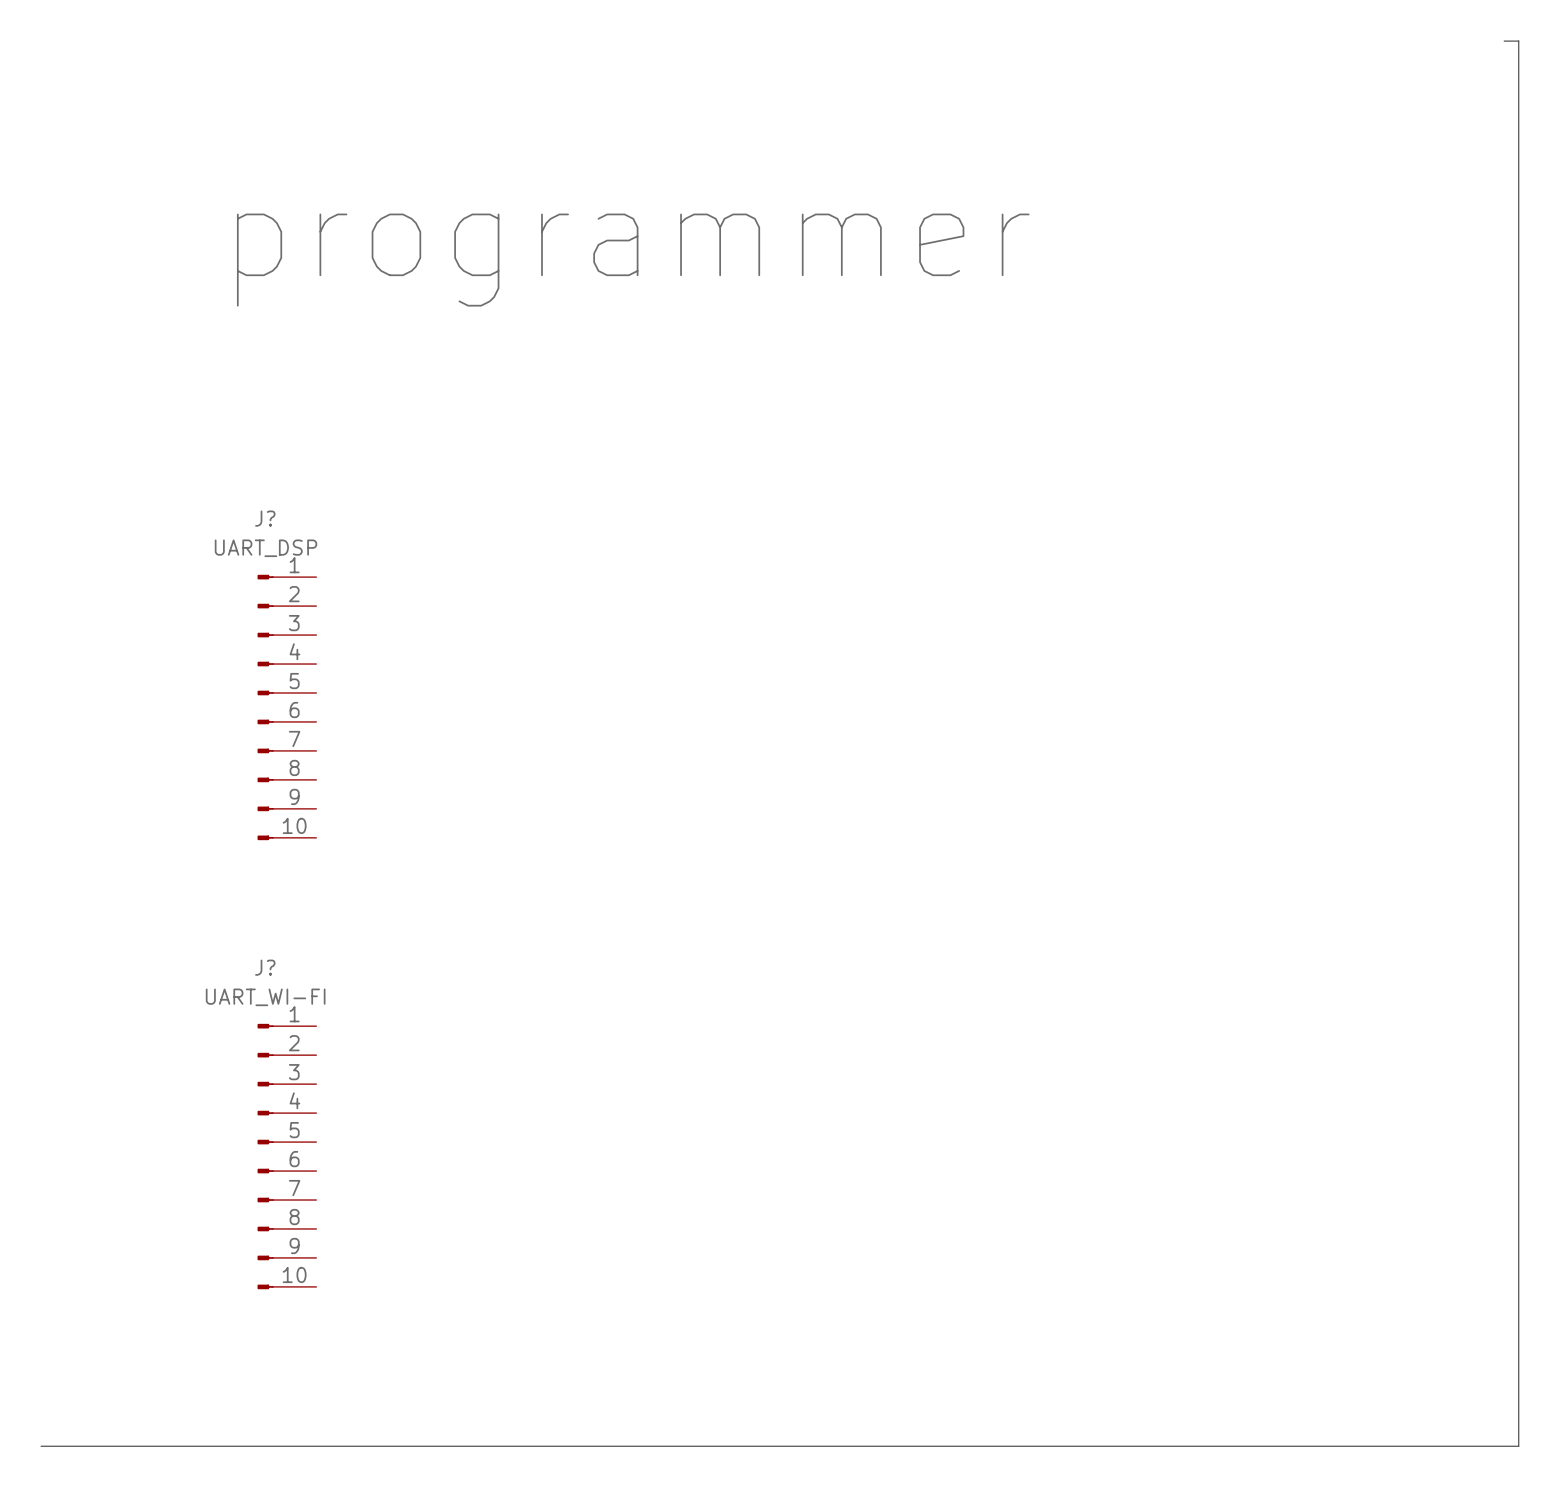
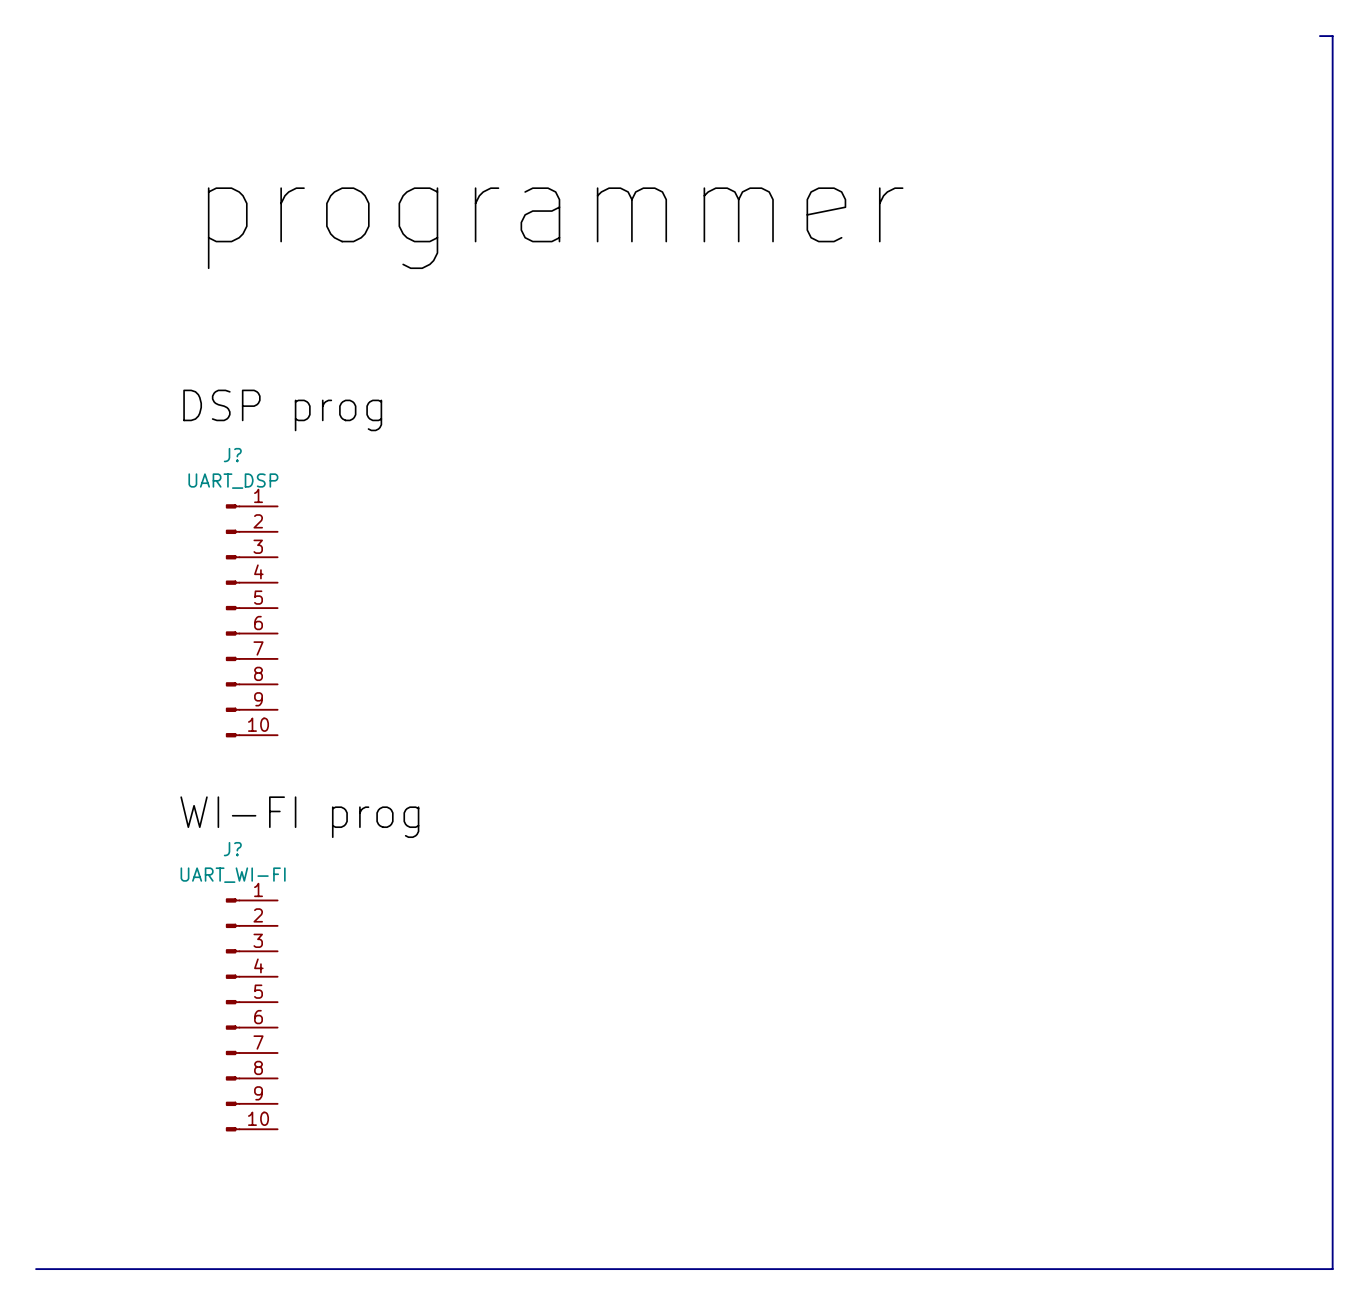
label: none -> DSP prog (282, 410)
label: none -> WI-FI prog (299, 817)

